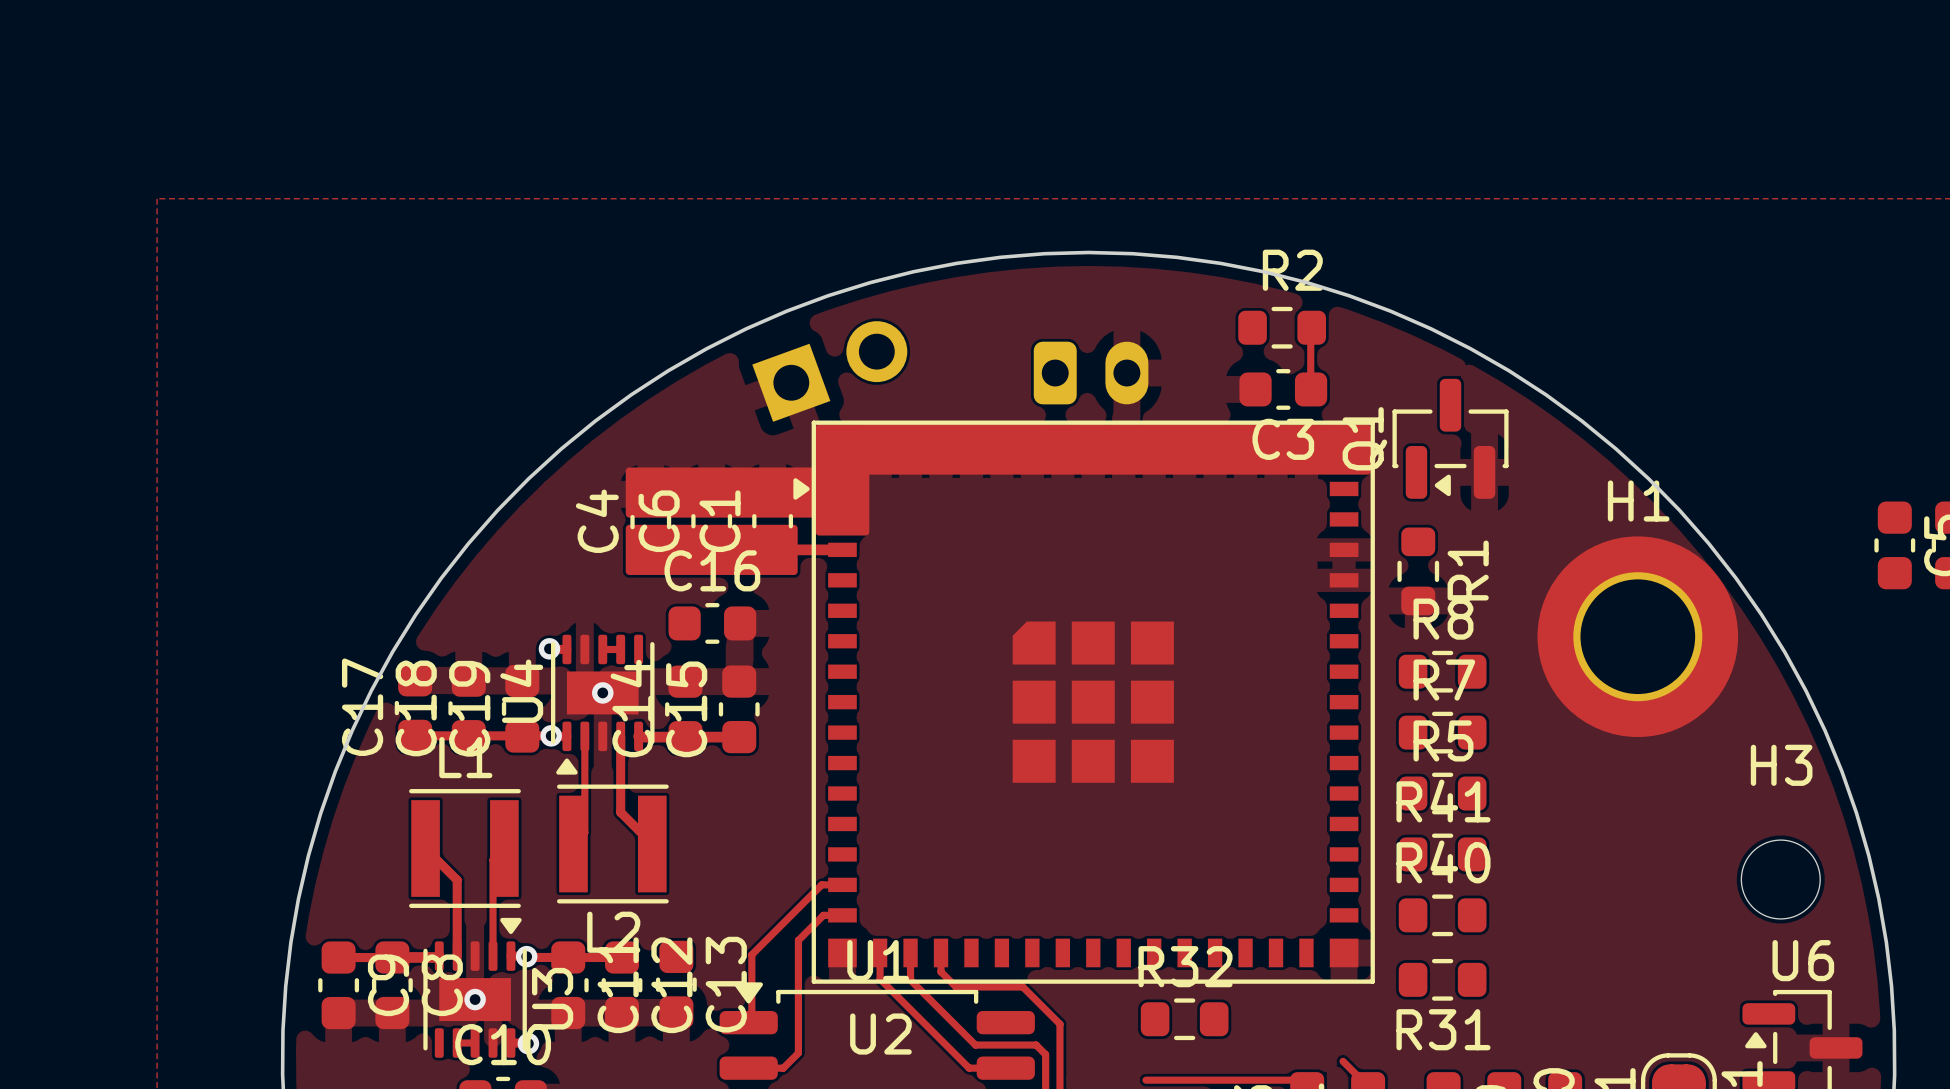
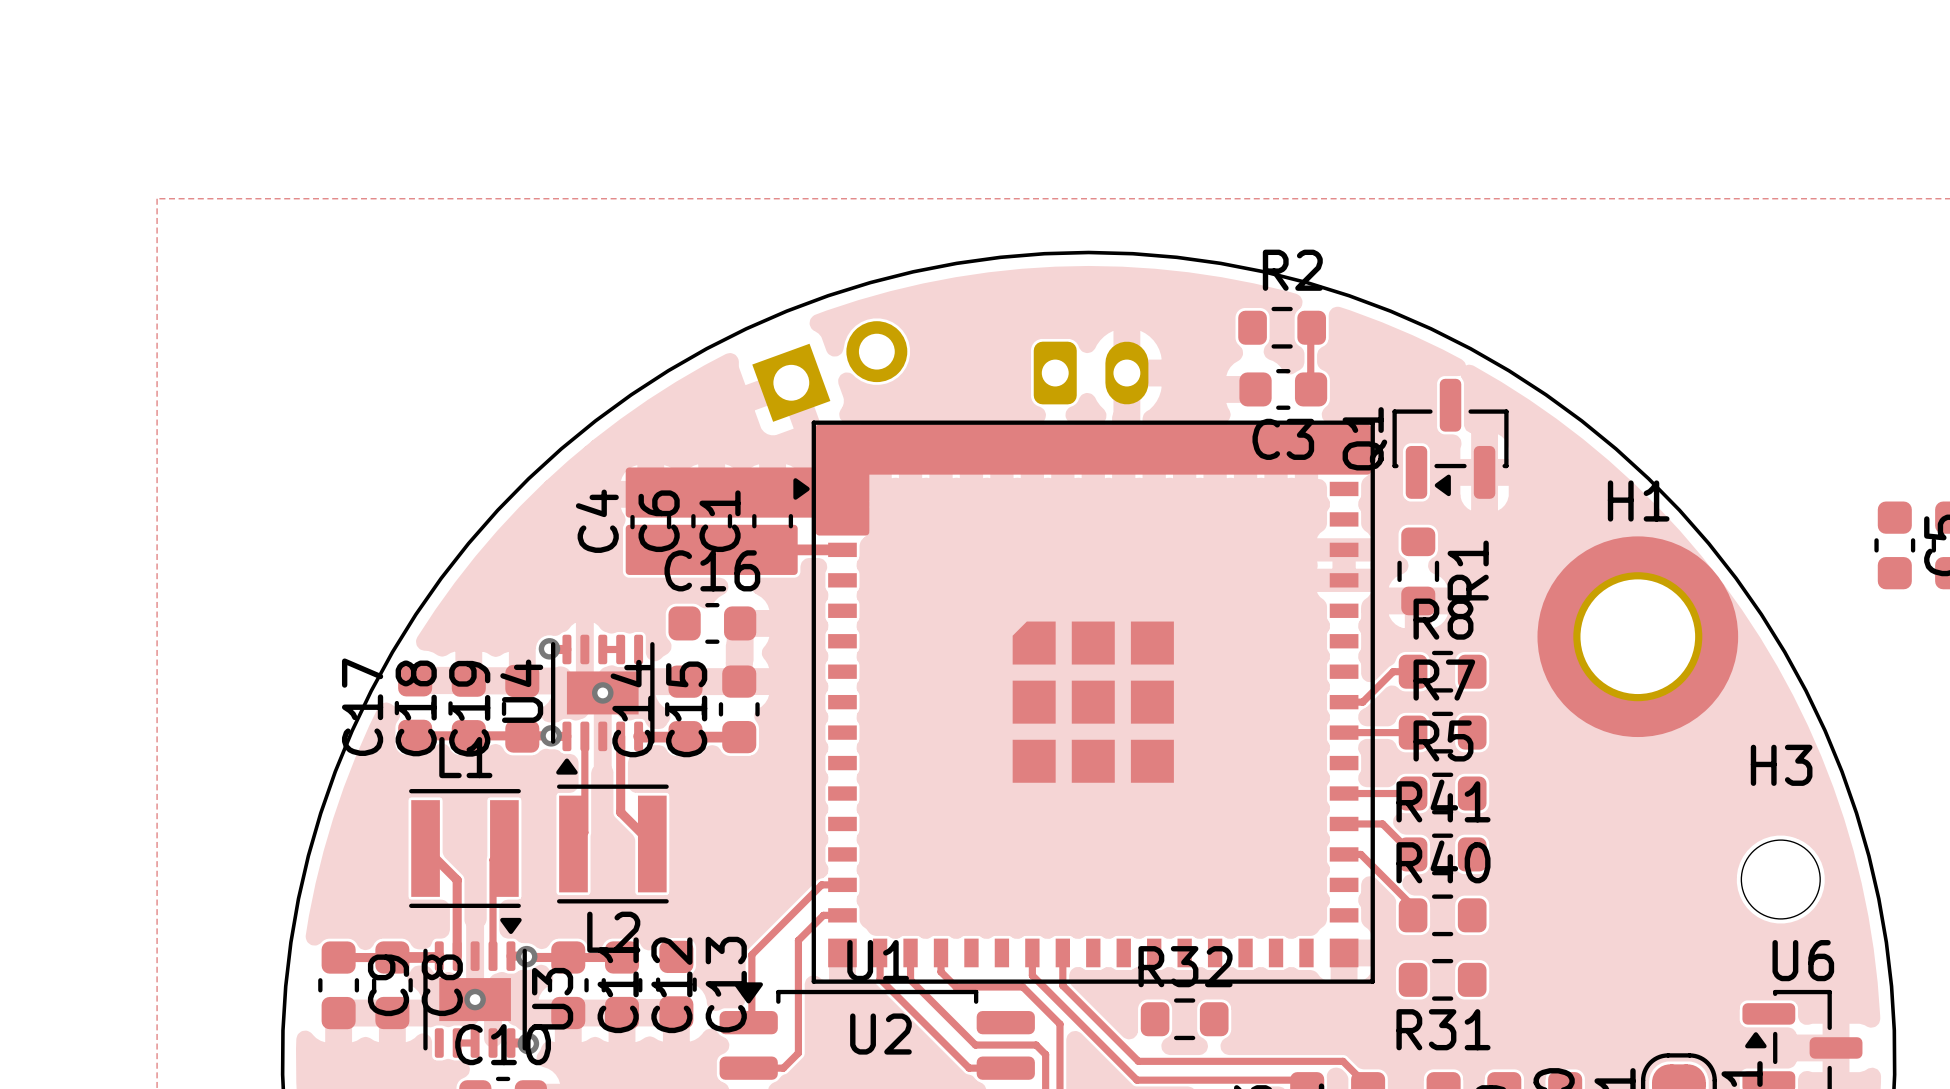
track: none -> (1413, 671) (1393, 671) (1362, 702) (1344, 702)
track: none -> (1344, 732) (1413, 732)
track: none -> (1344, 793) (1413, 793)
track: none -> (1344, 823) (1382, 823) (1413, 854)
track: none -> (1344, 854) (1360, 854) (1413, 906) (1413, 915)
track: none -> (1032, 952) (1032, 975) (1137, 1080) (1145, 1080)
track: none -> (1062, 952) (1062, 985) (1138, 1061) (1343, 1061)

